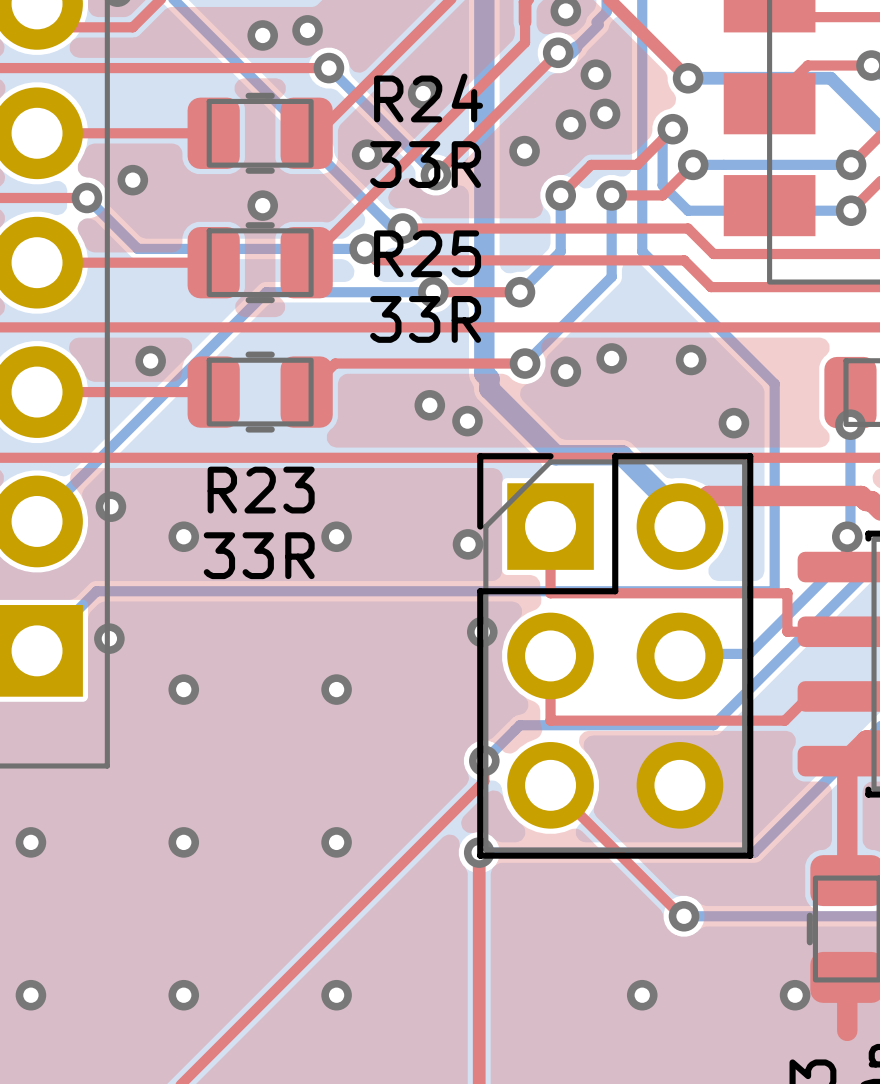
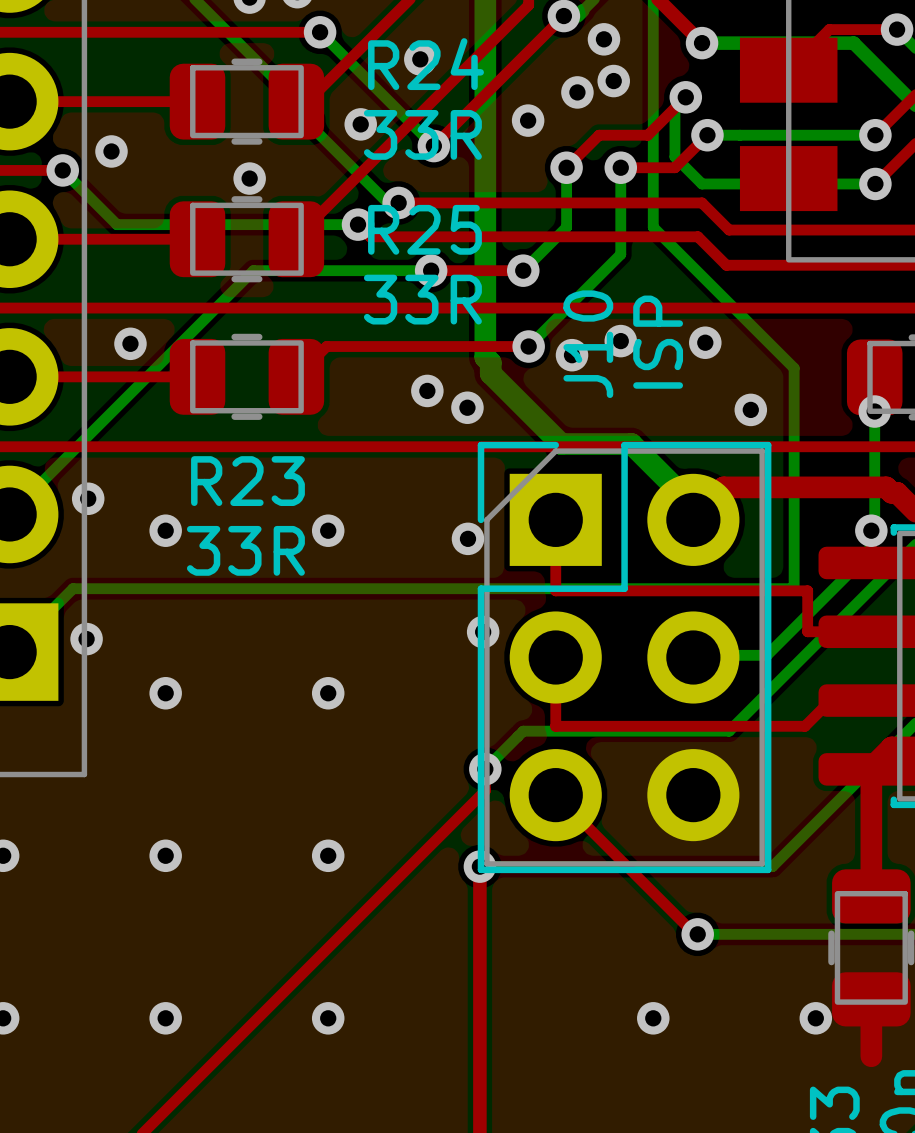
text: none -> ISP (658, 342)
text: none -> J10 (588, 344)

